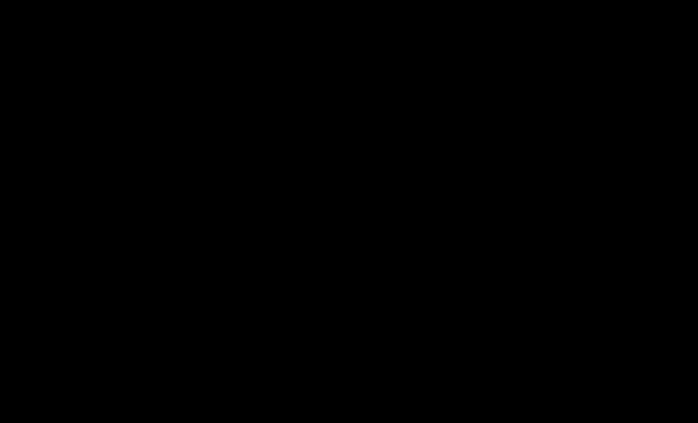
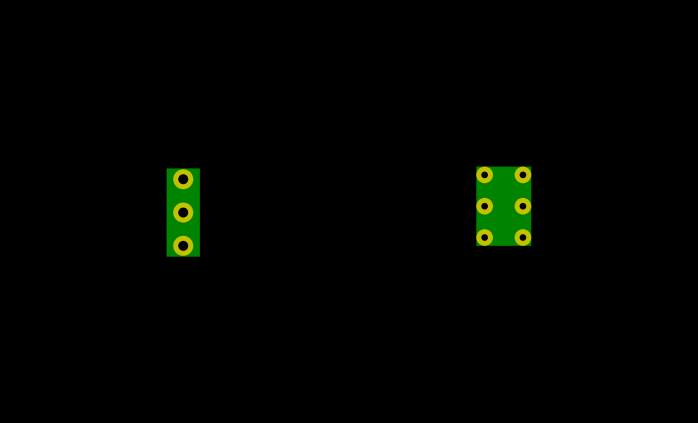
part: none -> (503, 206)
part: none -> (183, 212)

